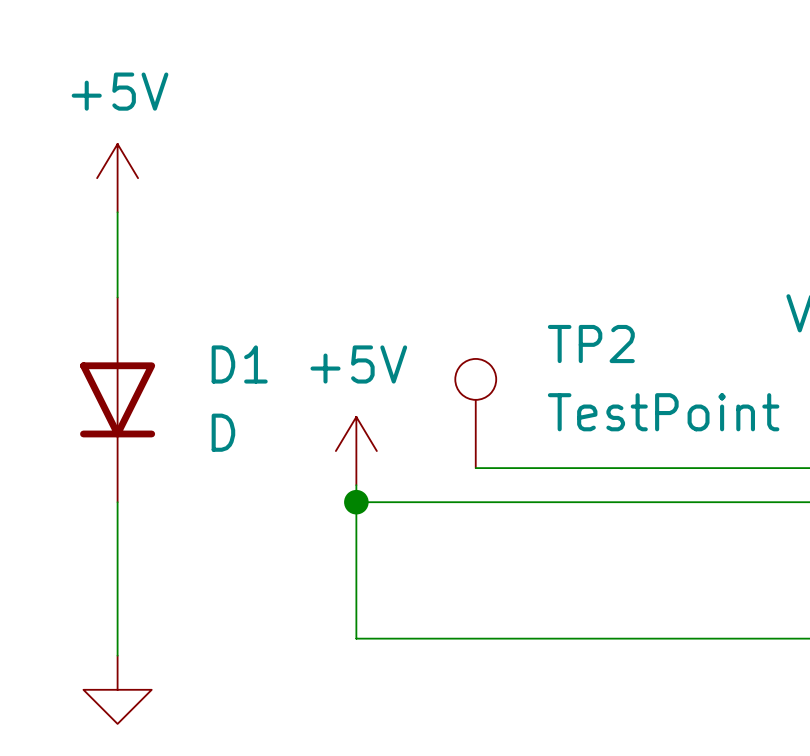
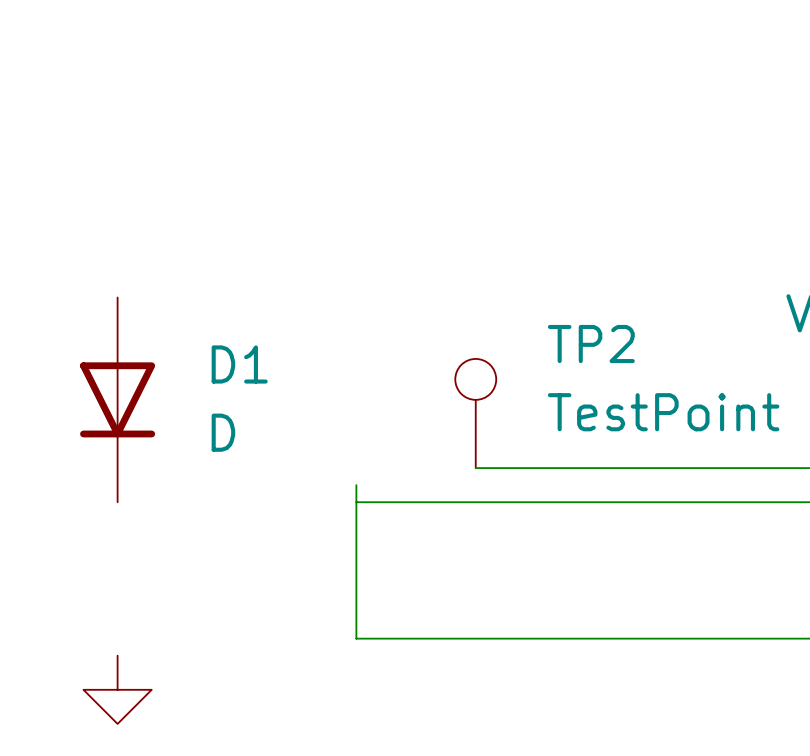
power symbol: +5V (117, 178) -> none
wire: (117, 212) (117, 297) -> none
power symbol: +5V (356, 451) -> none
wire: (117, 502) (117, 655) -> none
junction: (356, 502) -> none

